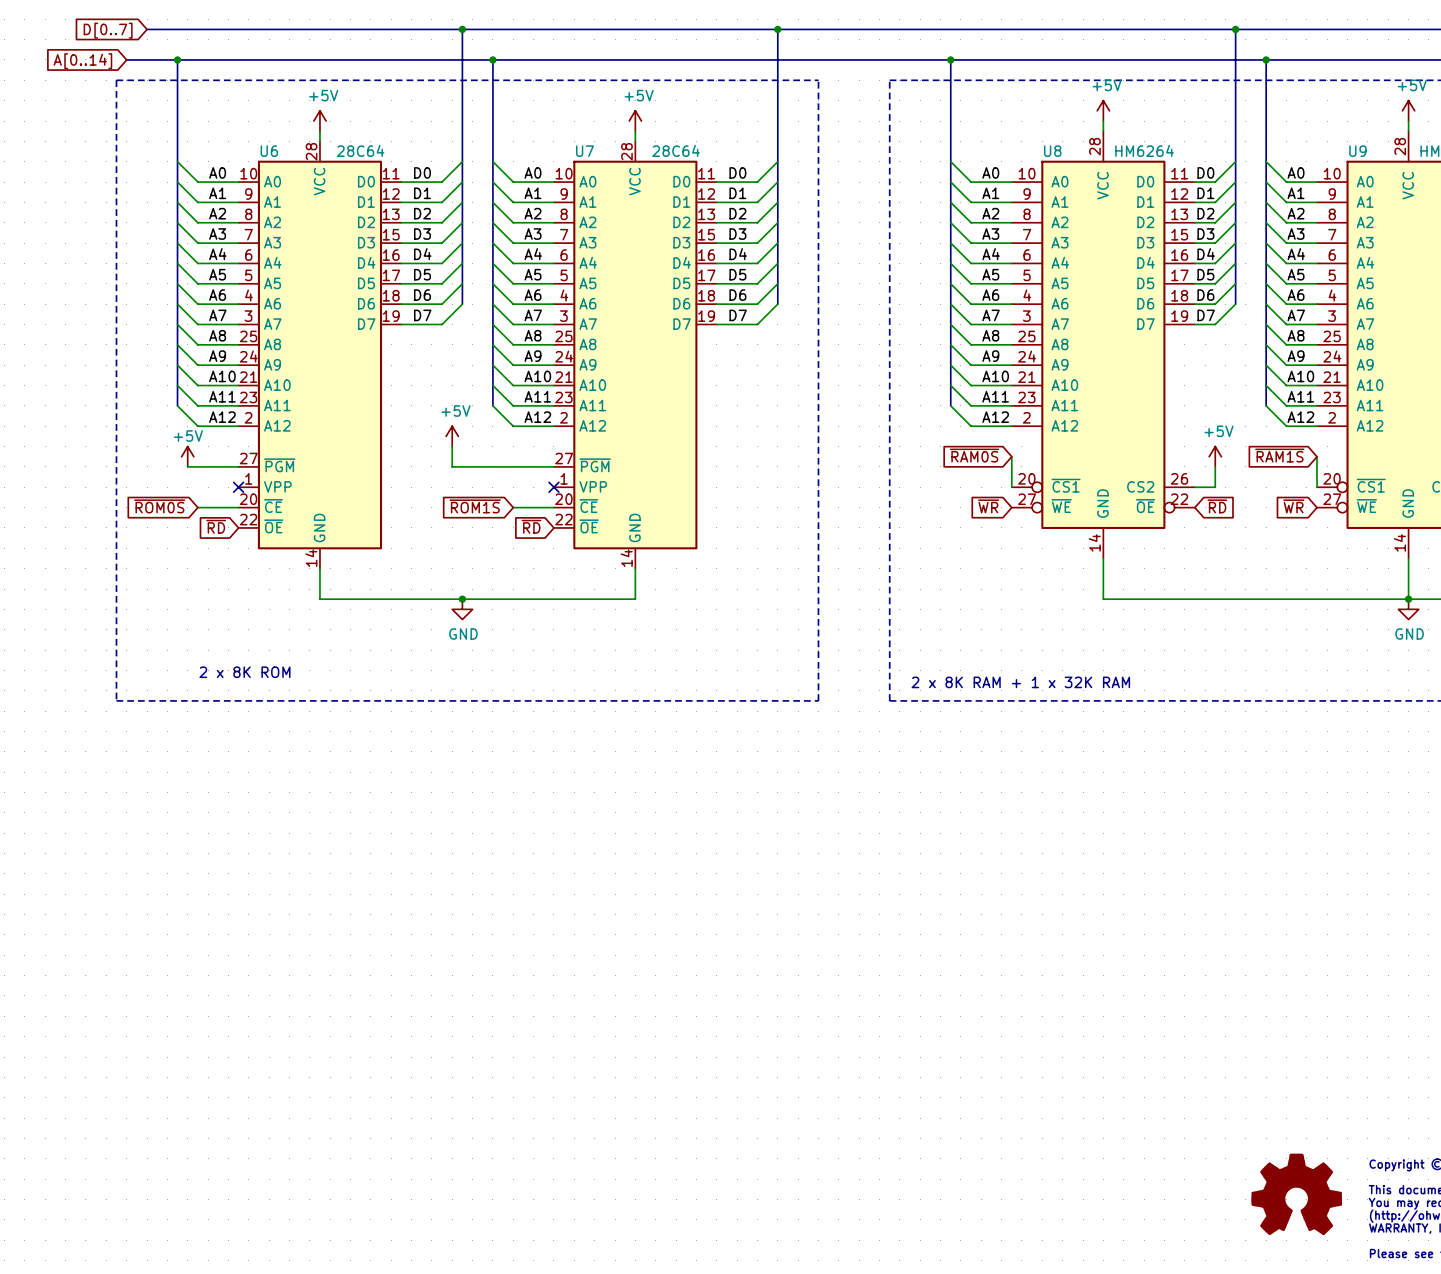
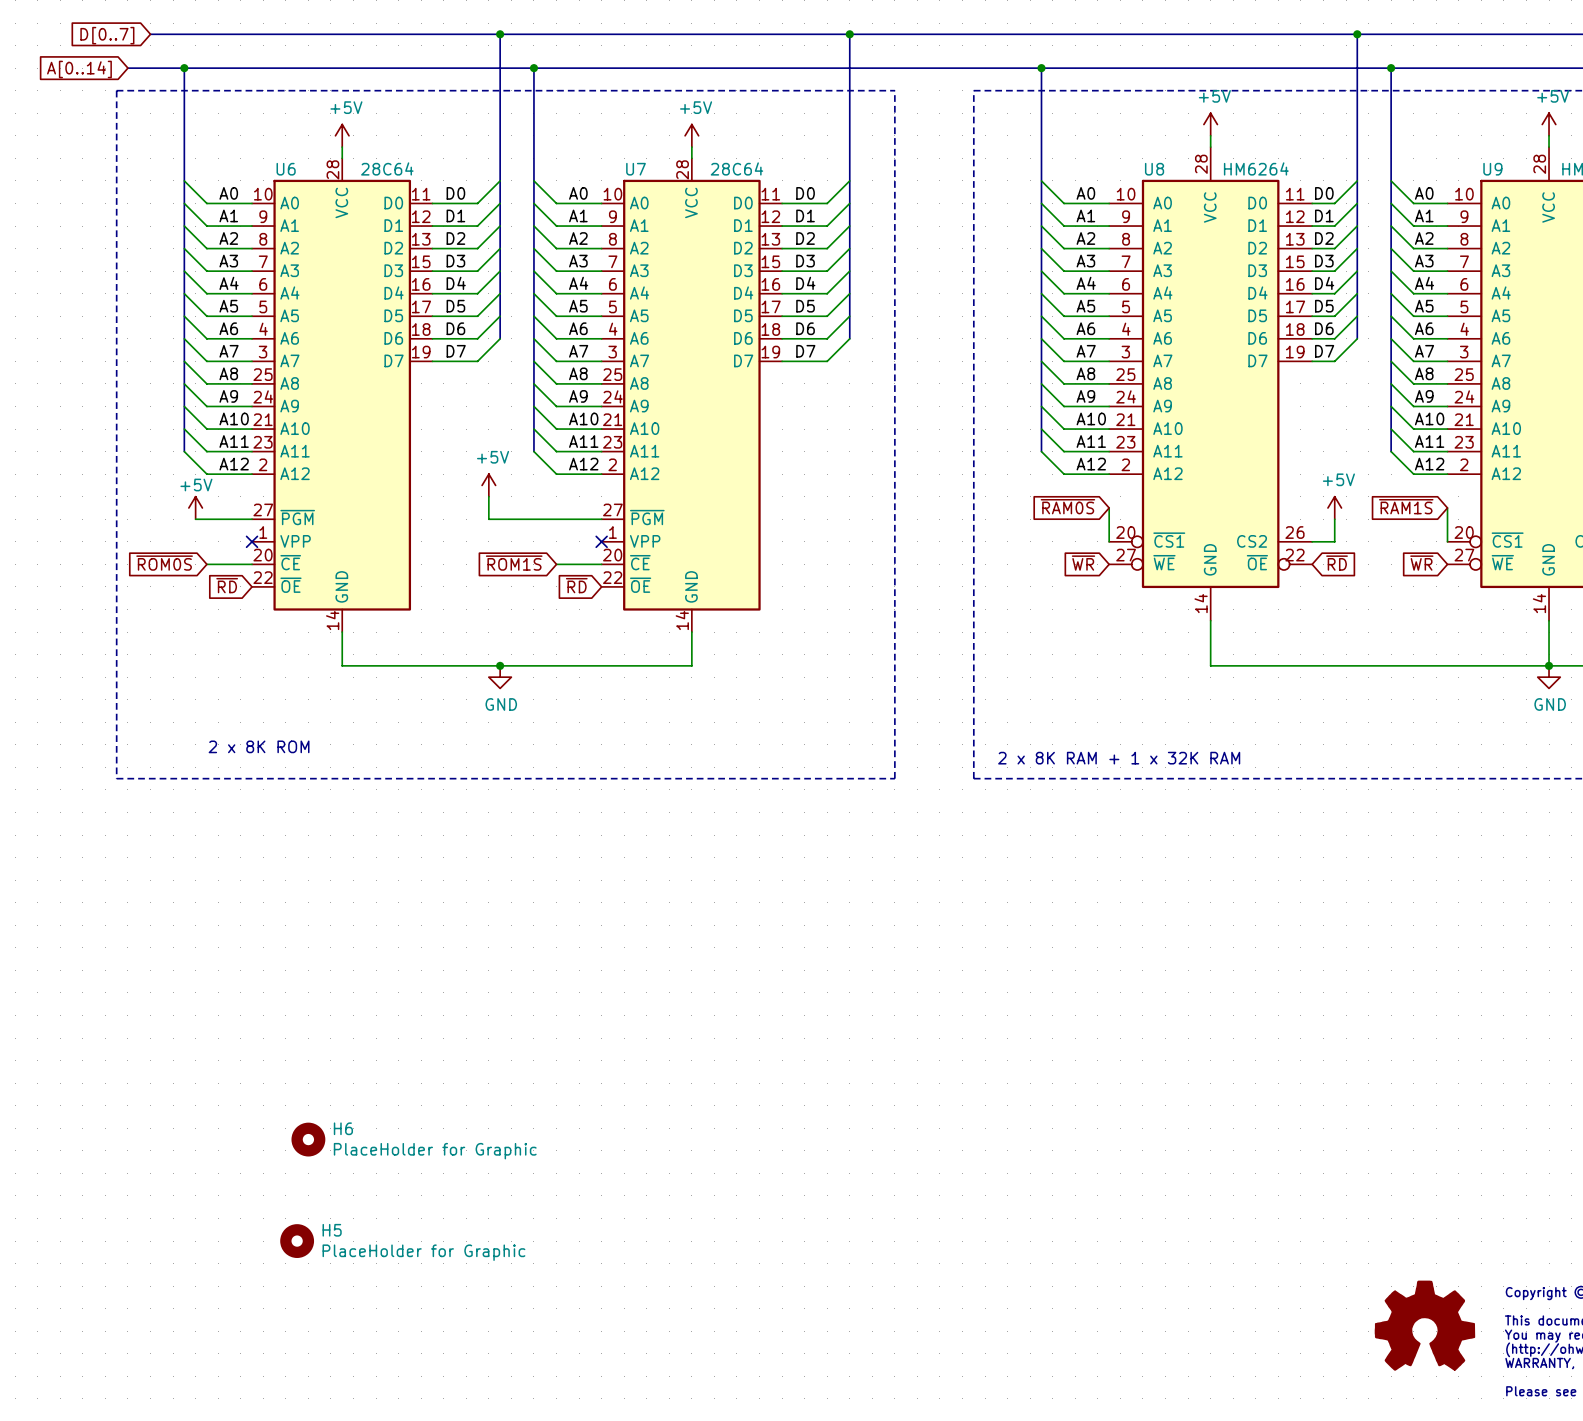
H6: none -> PlaceHolder for Graphic (308, 1139)
H5: none -> PlaceHolder for Graphic (297, 1241)

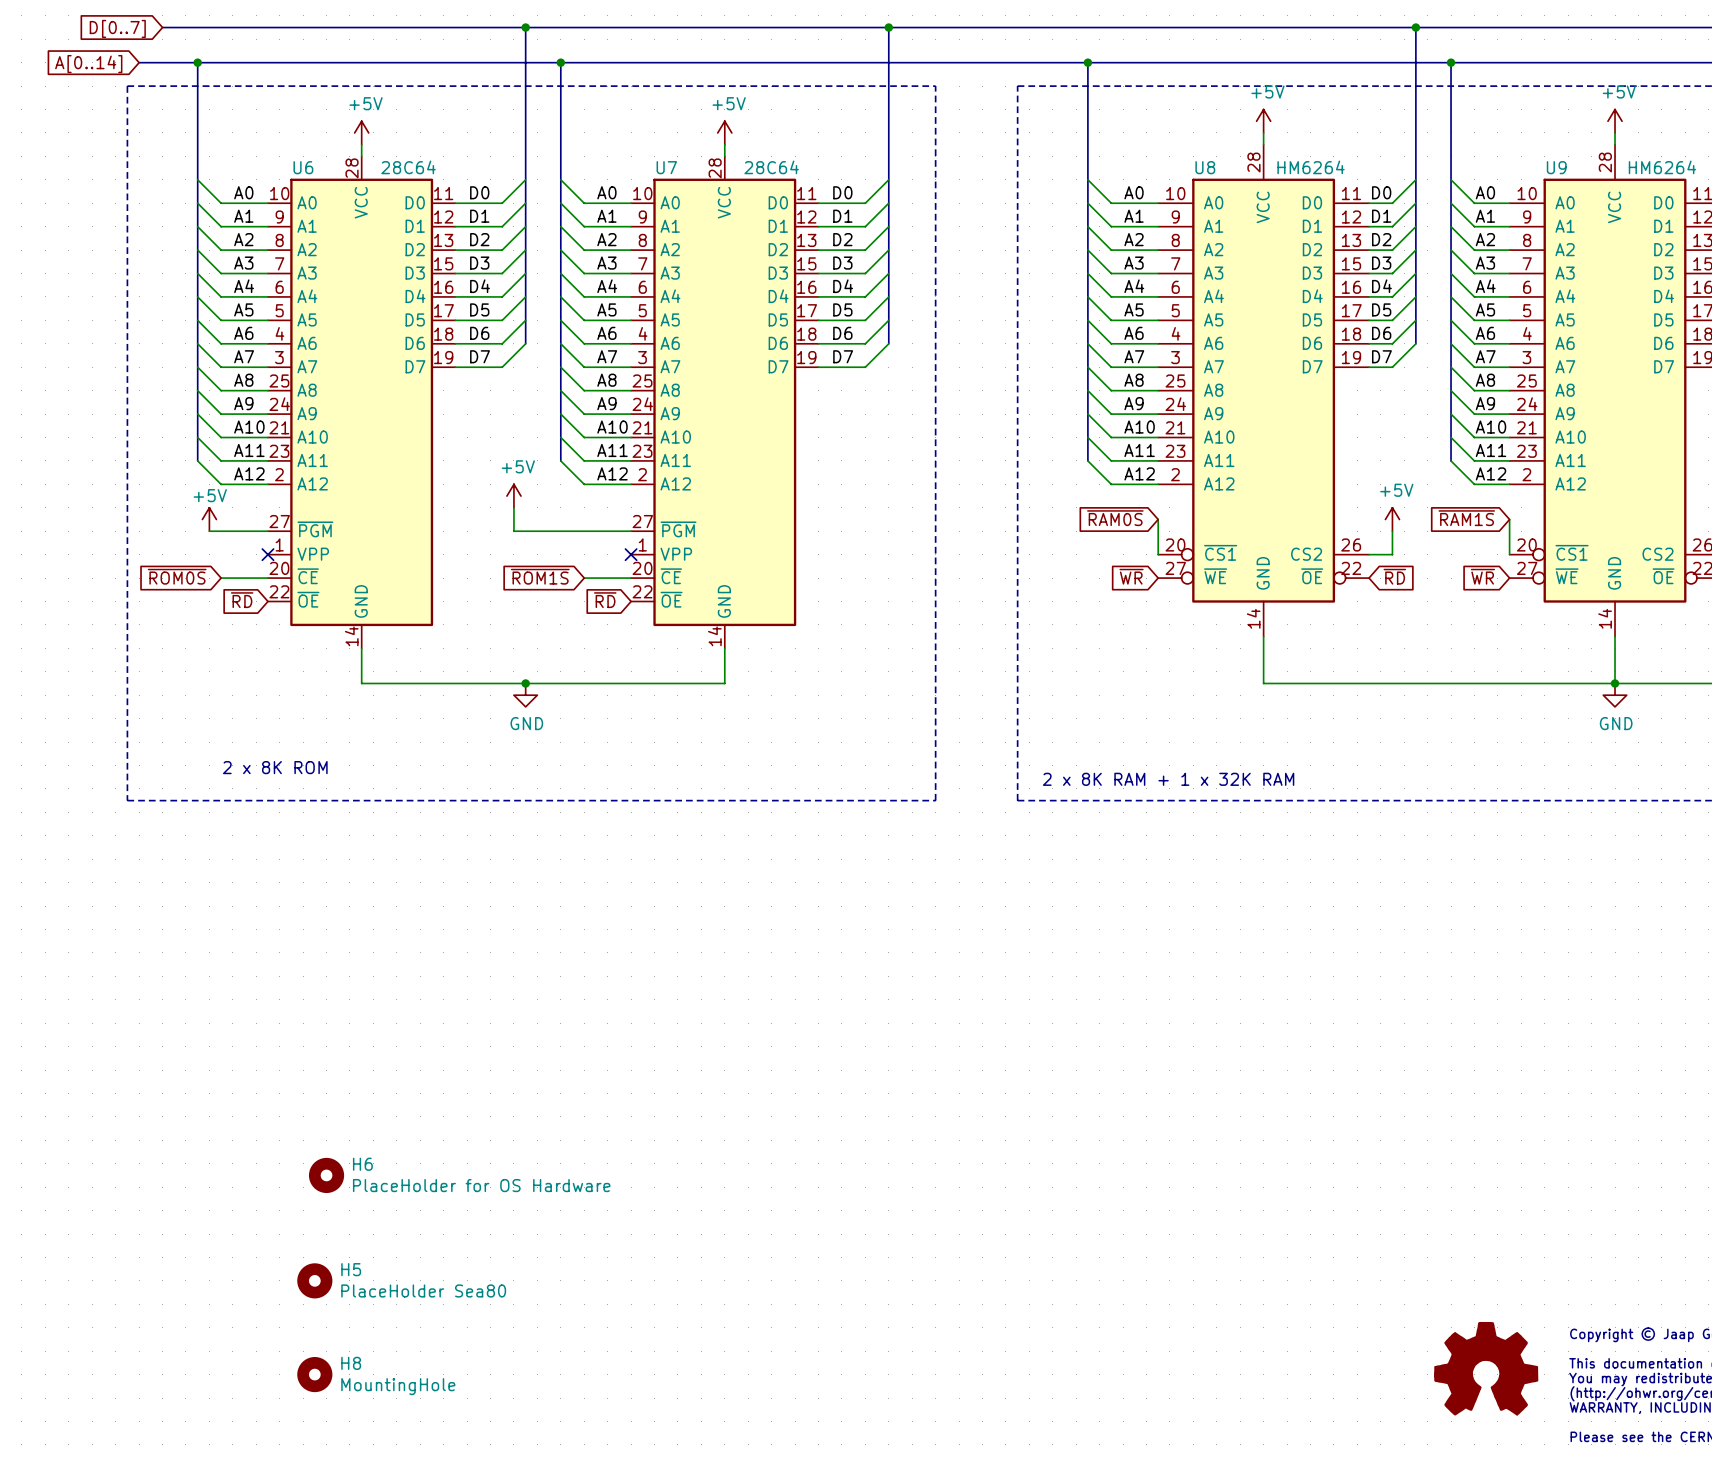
H6 value: PlaceHolder for Graphic (435, 1151) -> PlaceHolder for OS Hardware (481, 1185)
H5 value: PlaceHolder for Graphic (423, 1252) -> PlaceHolder Sea80 (423, 1290)
H8: none -> MountingHole (314, 1374)

